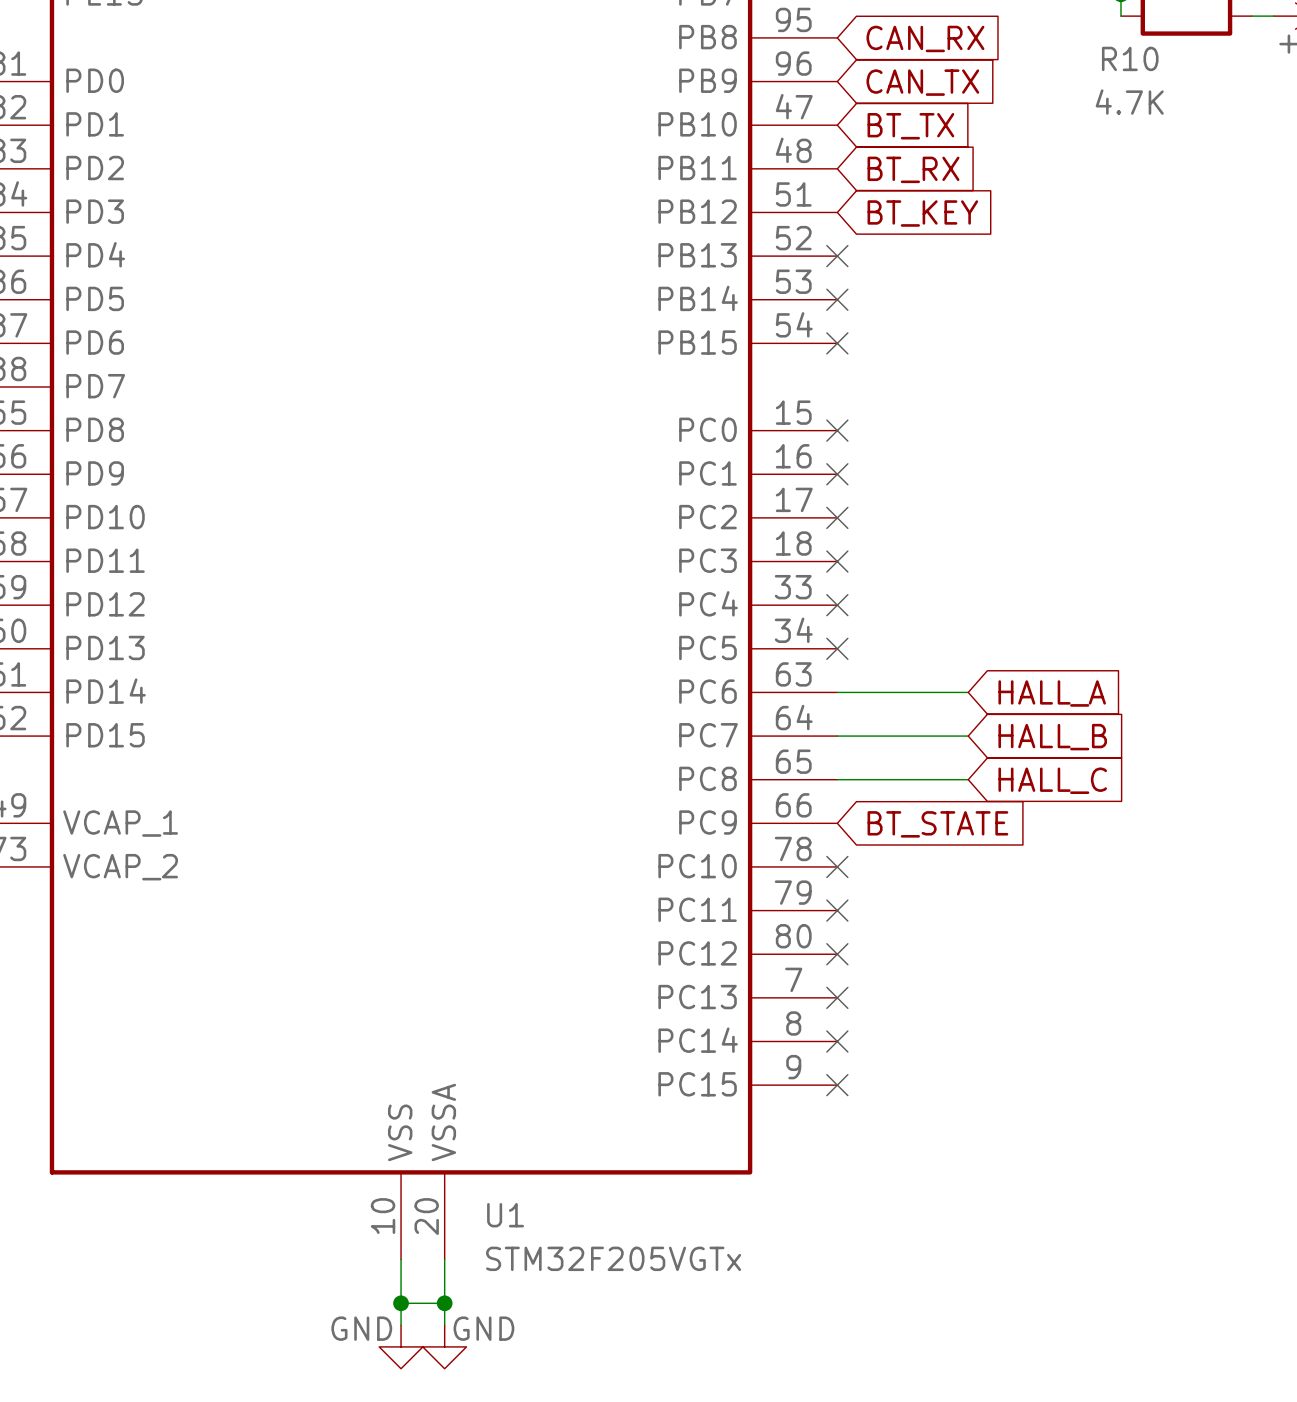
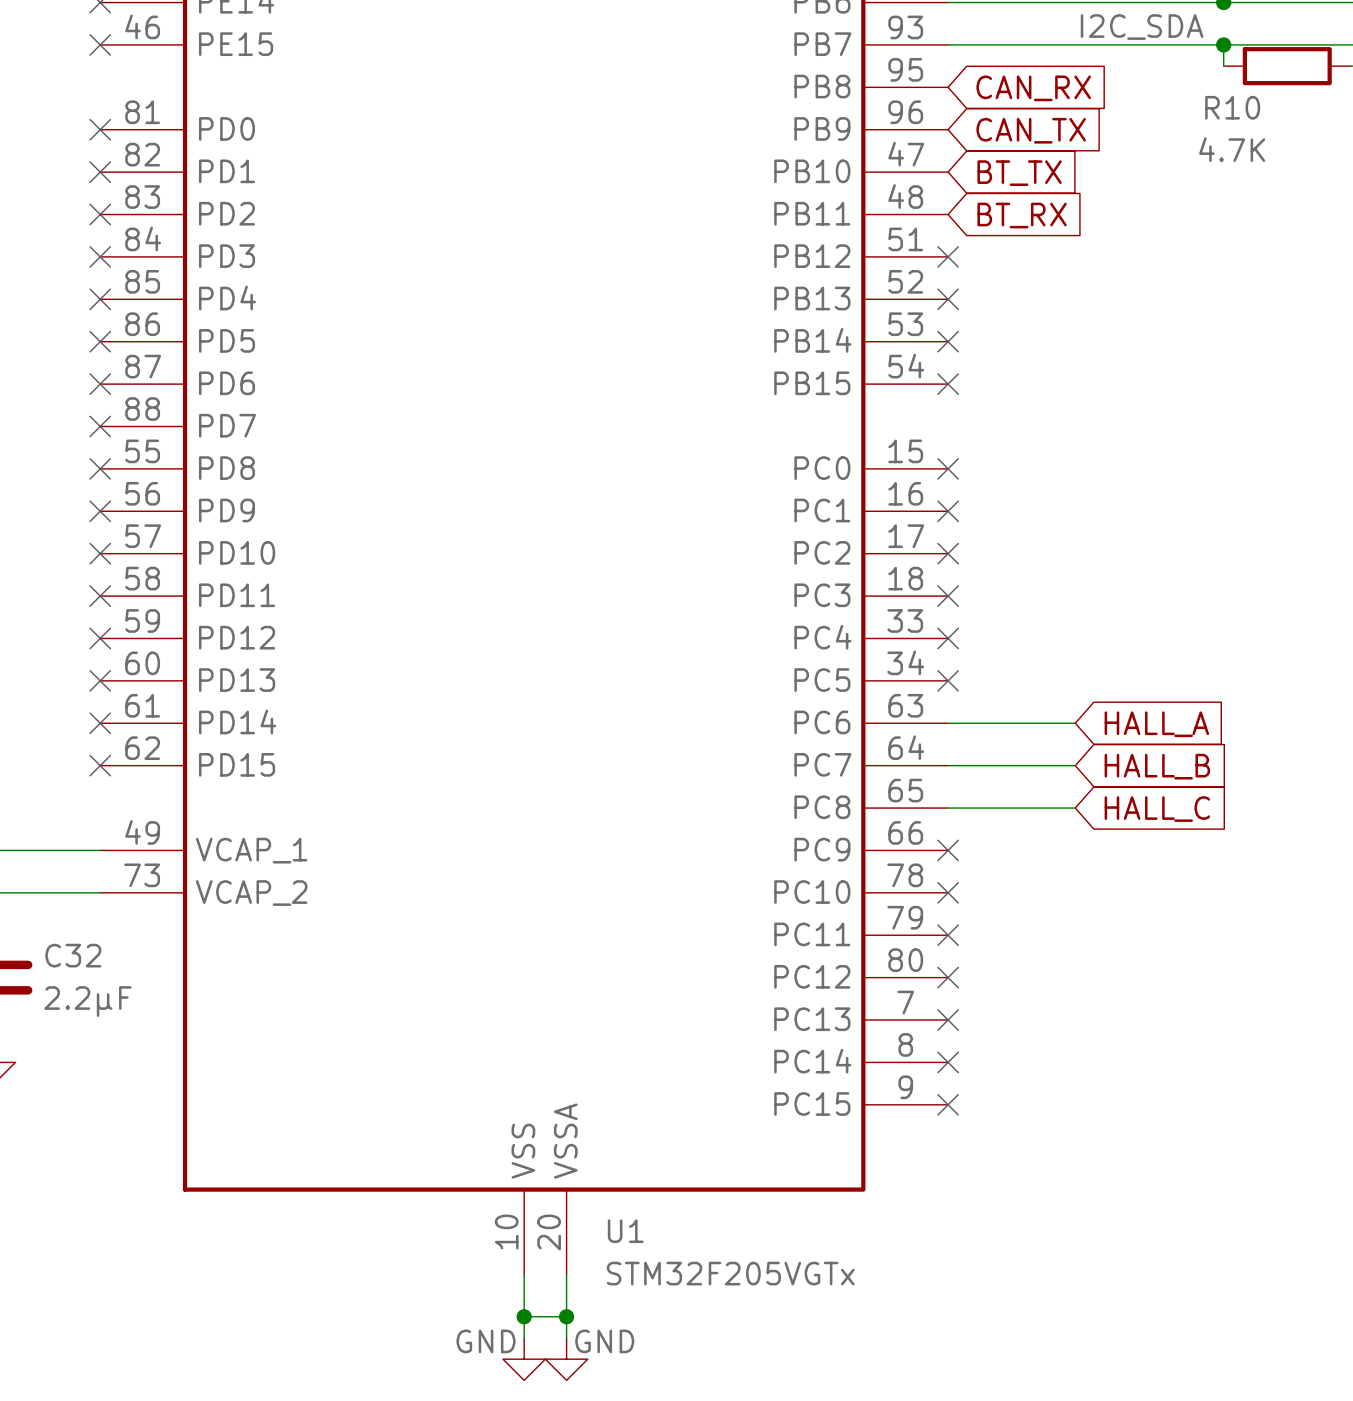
no-connect mark: none -> (948, 256)
global label: BT_KEY (922, 213) -> none
no-connect mark: none -> (948, 850)
global label: BT_STATE (937, 824) -> none

